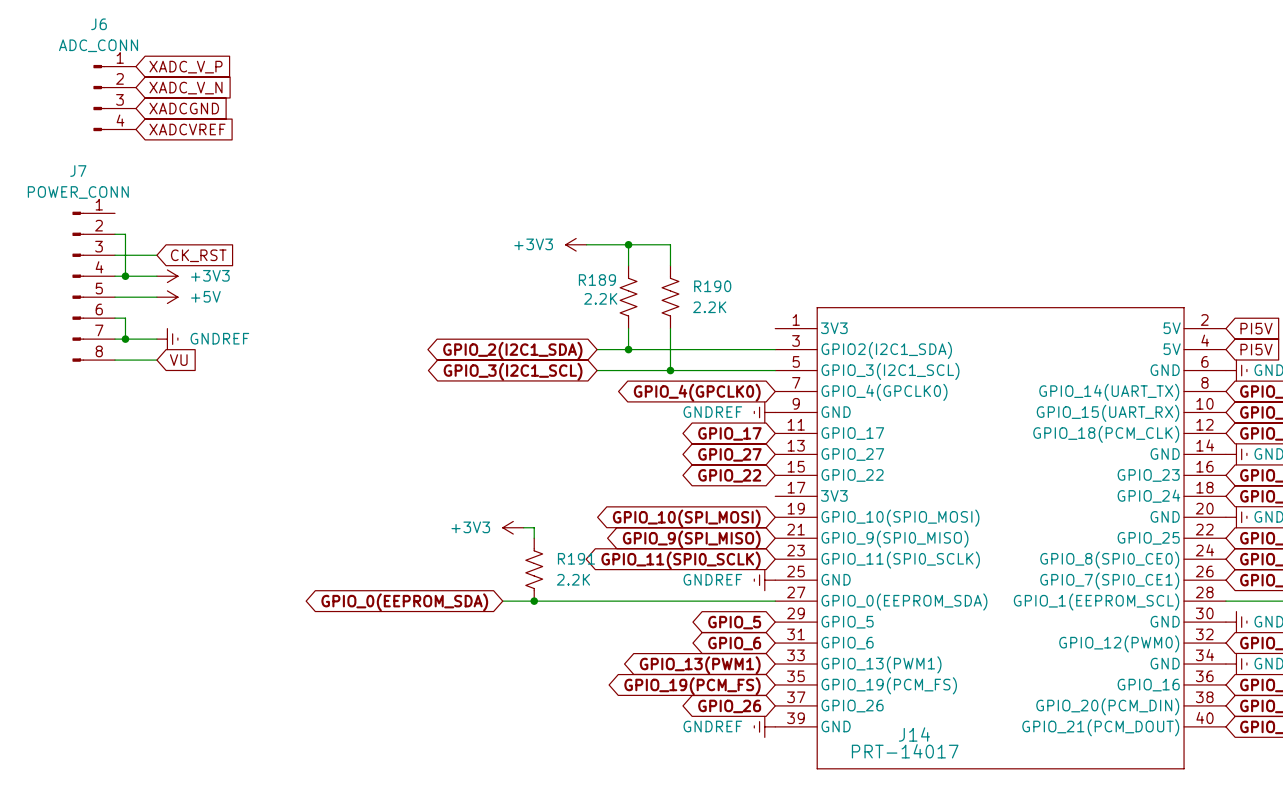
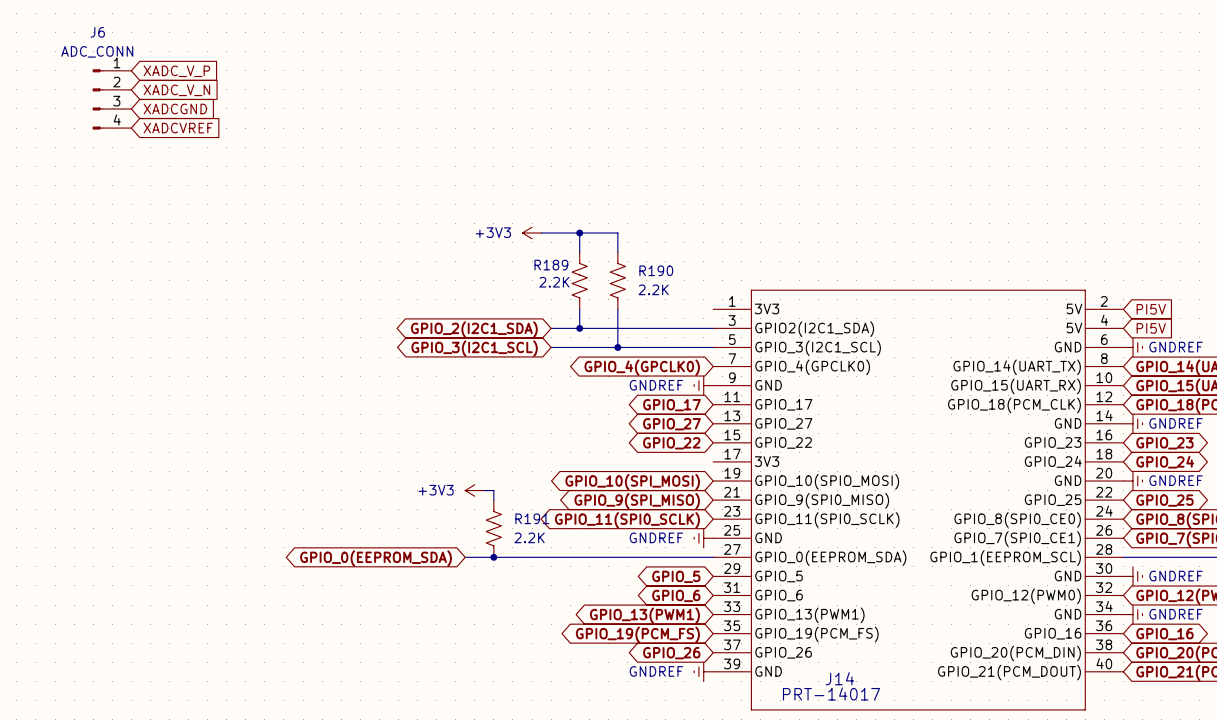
wire: (115, 234) (125, 234) (125, 276) -> none
wire: (115, 255) (156, 255) -> none
global label: CK_RST (198, 255) -> none
wire: (115, 276) (156, 276) -> none
junction: (125, 276) -> none
power symbol: +3V3 (167, 276) -> none
J7: POWER_CONN (93, 286) -> none
wire: (115, 297) (156, 297) -> none
power symbol: +5V (167, 297) -> none
wire: (115, 318) (125, 318) (125, 339) -> none
wire: (115, 339) (156, 339) -> none
junction: (125, 339) -> none
power symbol: GNDREF (167, 339) -> none
wire: (115, 360) (156, 360) -> none
global label: VU (178, 360) -> none

